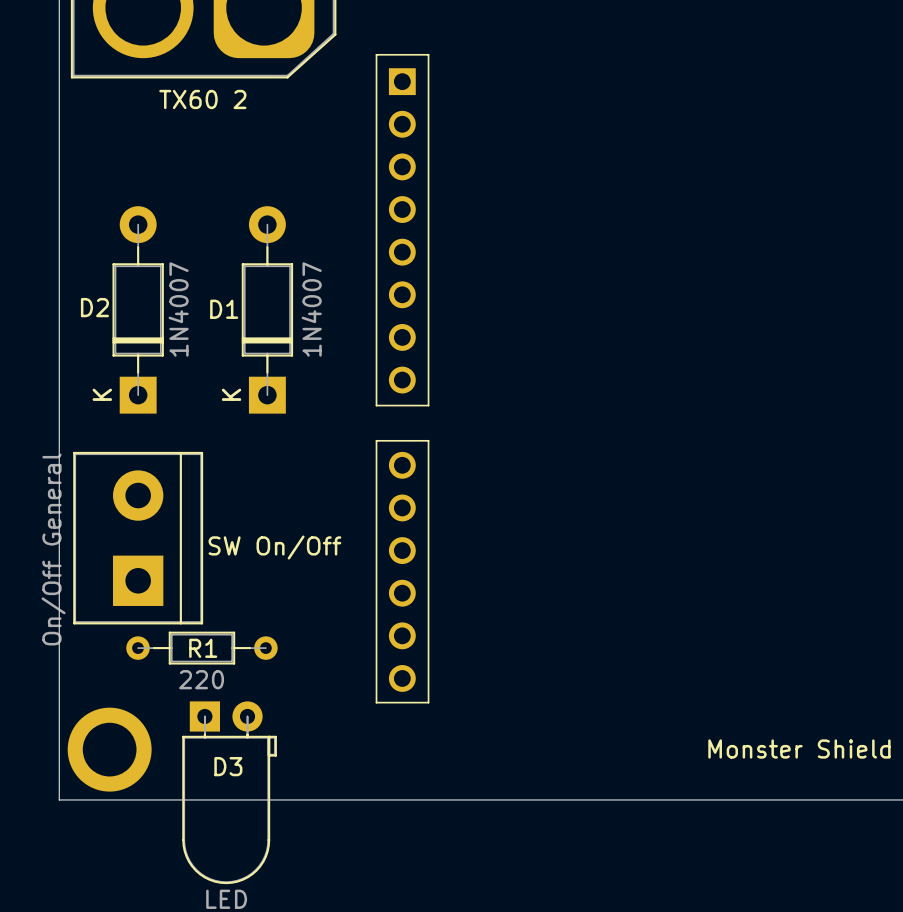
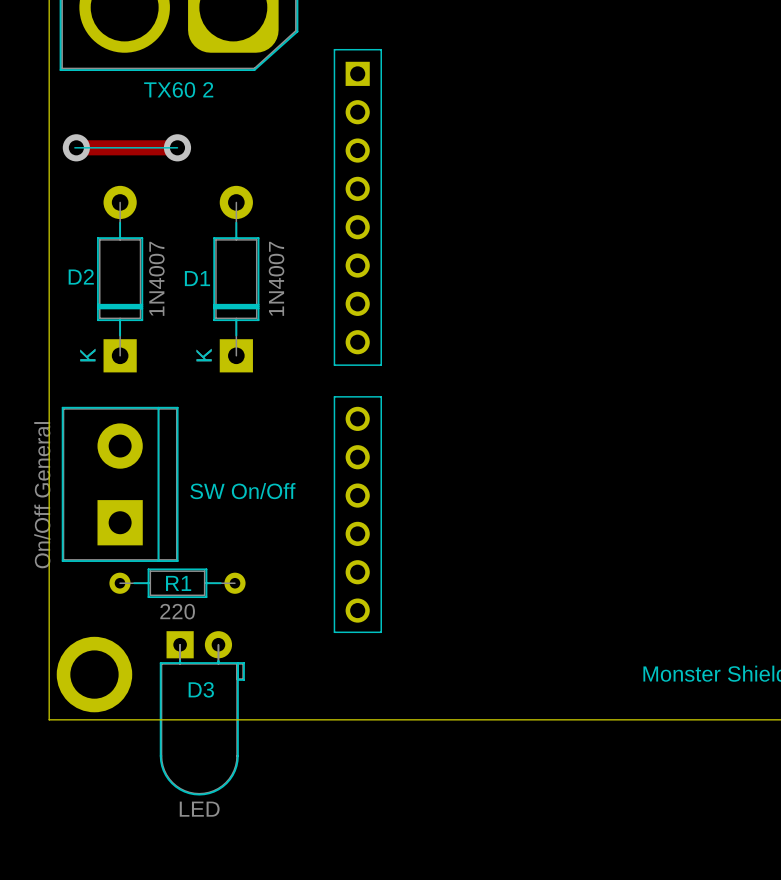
line: none -> (74, 147) (177, 147)
track: none -> (76, 147) (177, 147)
via: none -> (76, 147)
via: none -> (177, 147)

